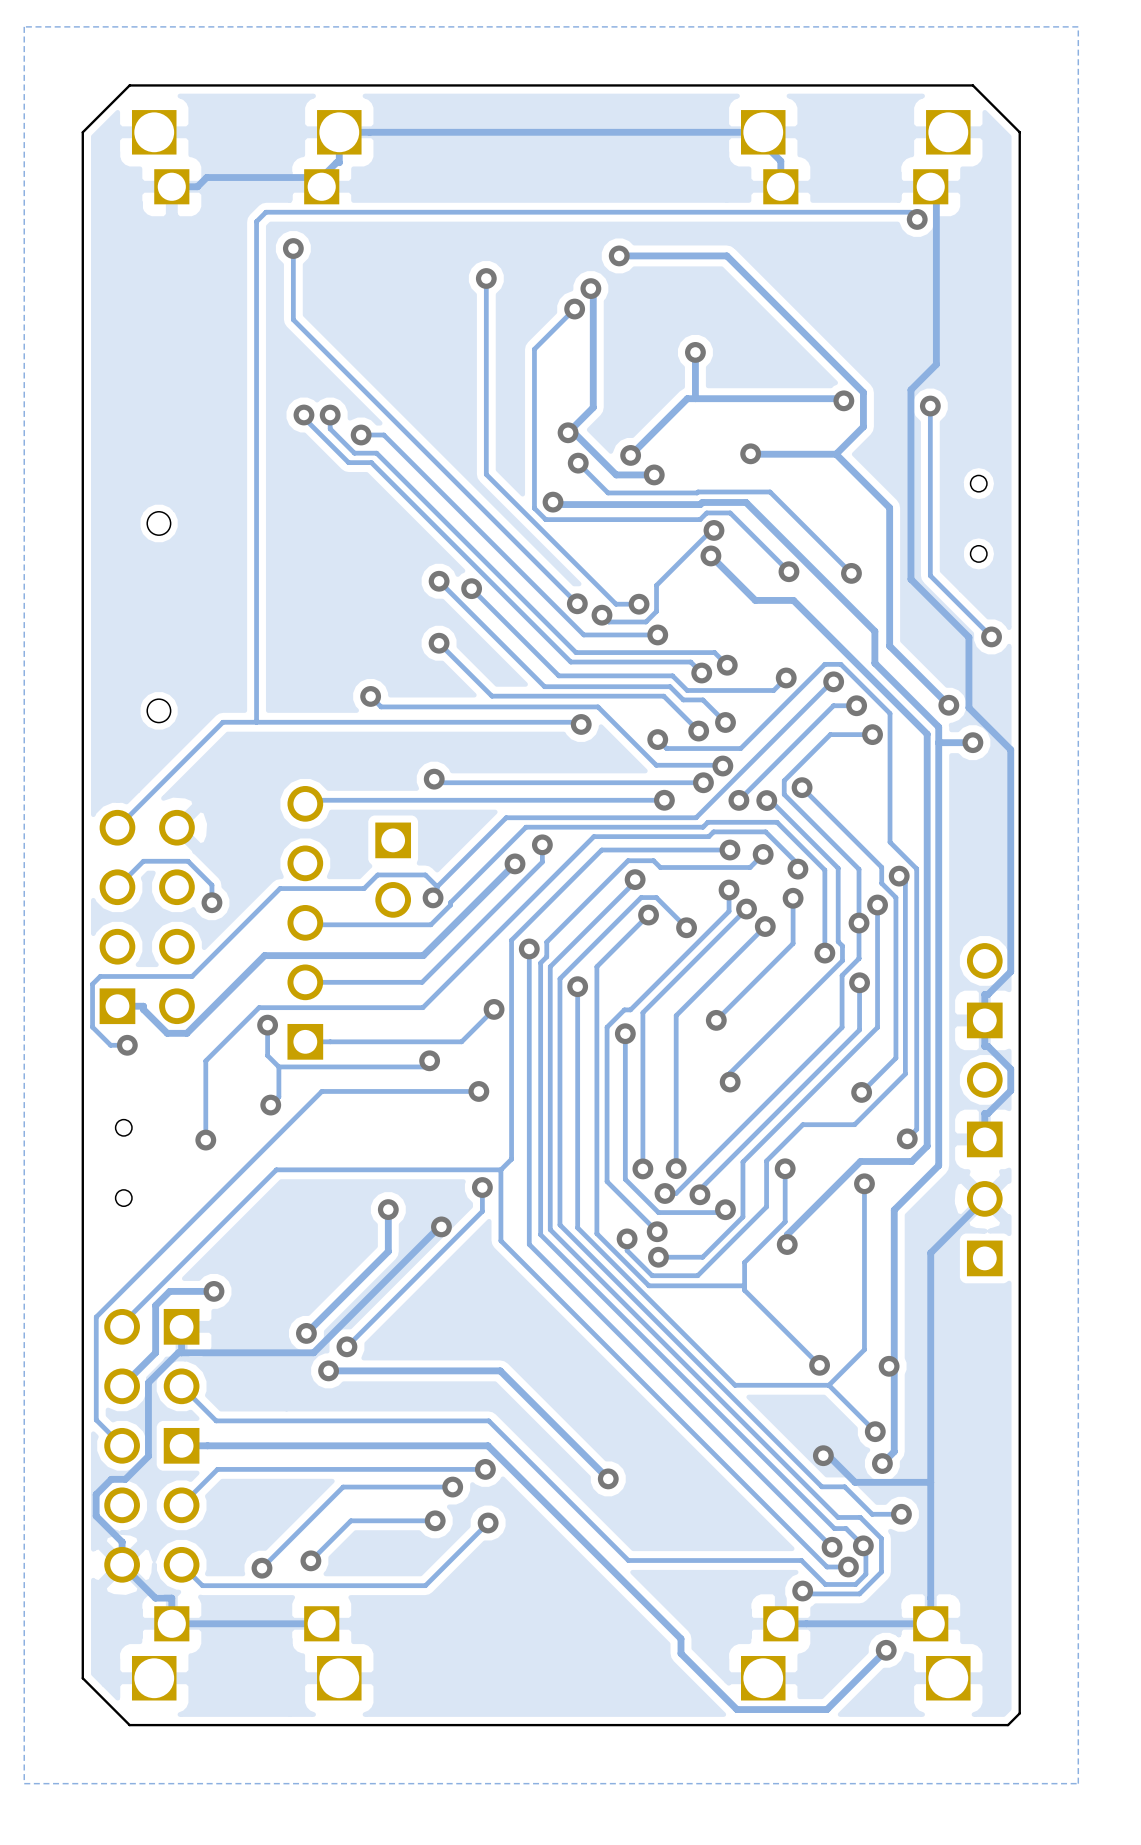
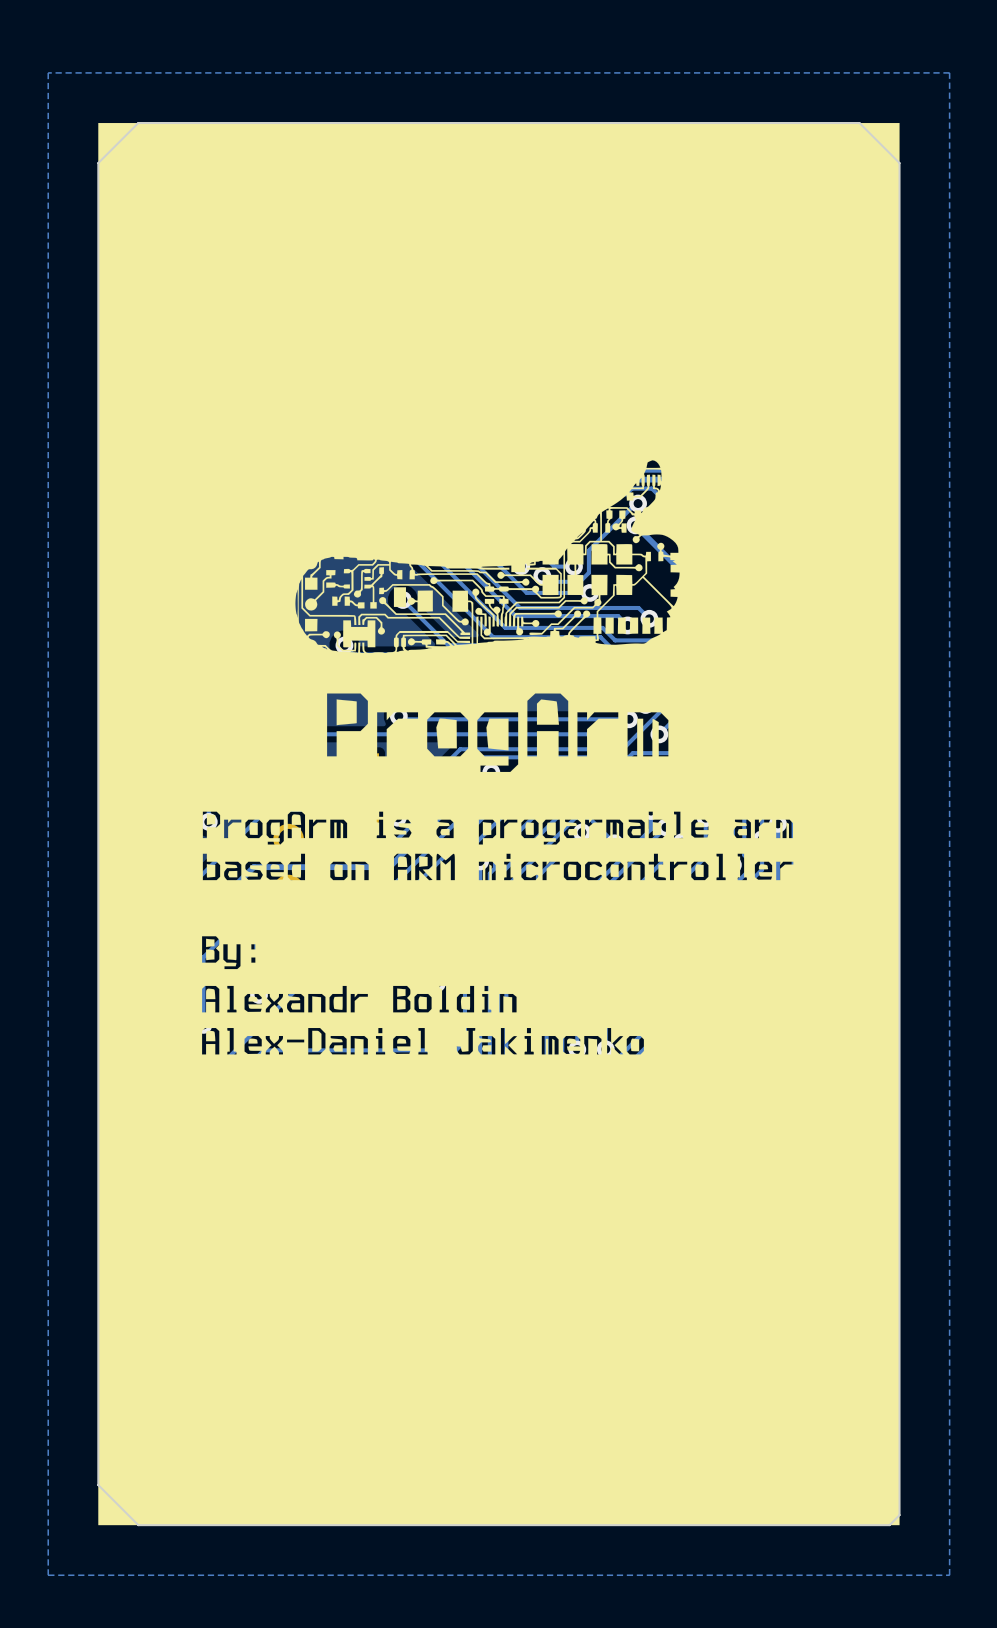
drawing: none -> [98, 123, 900, 1526]

